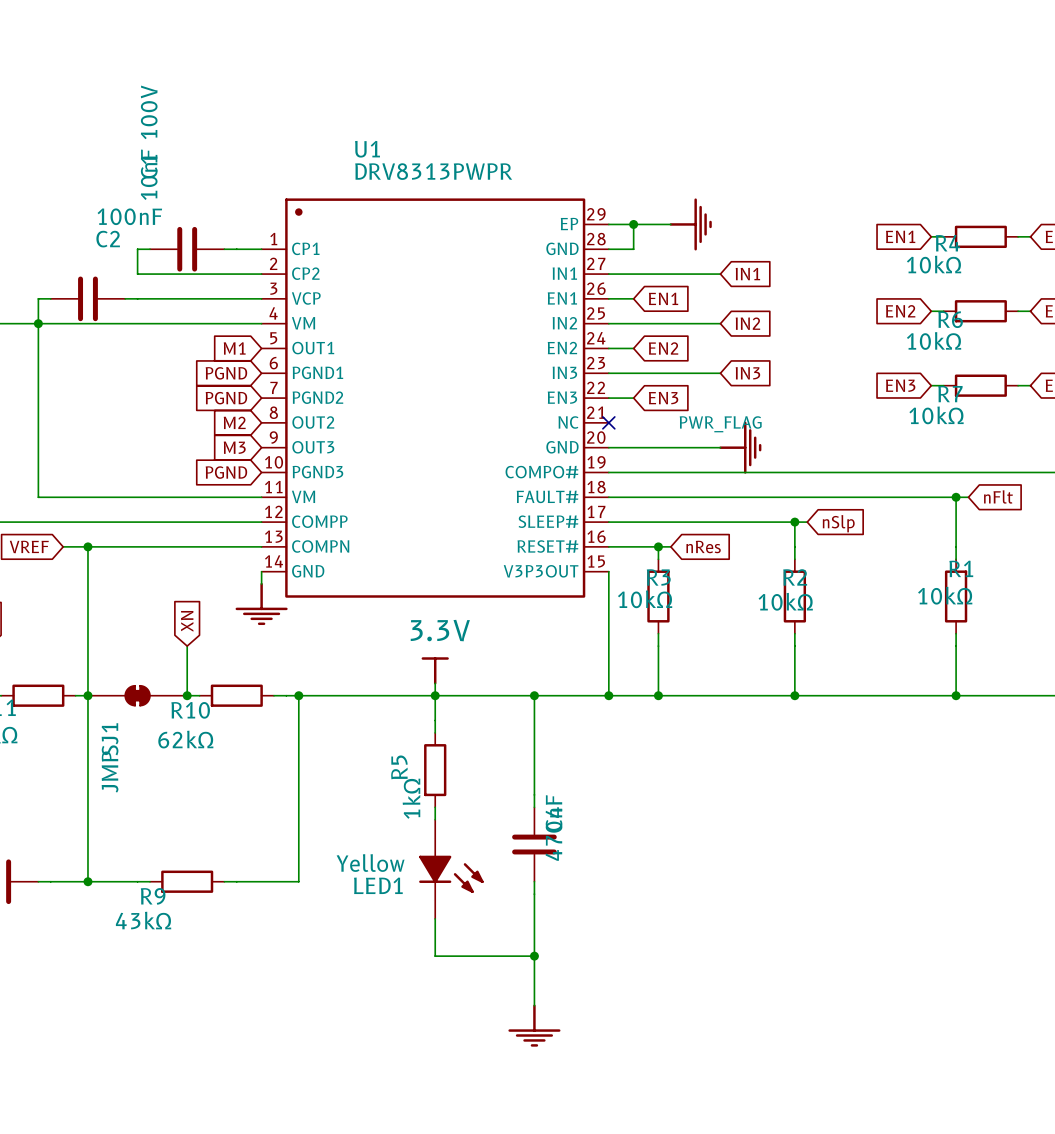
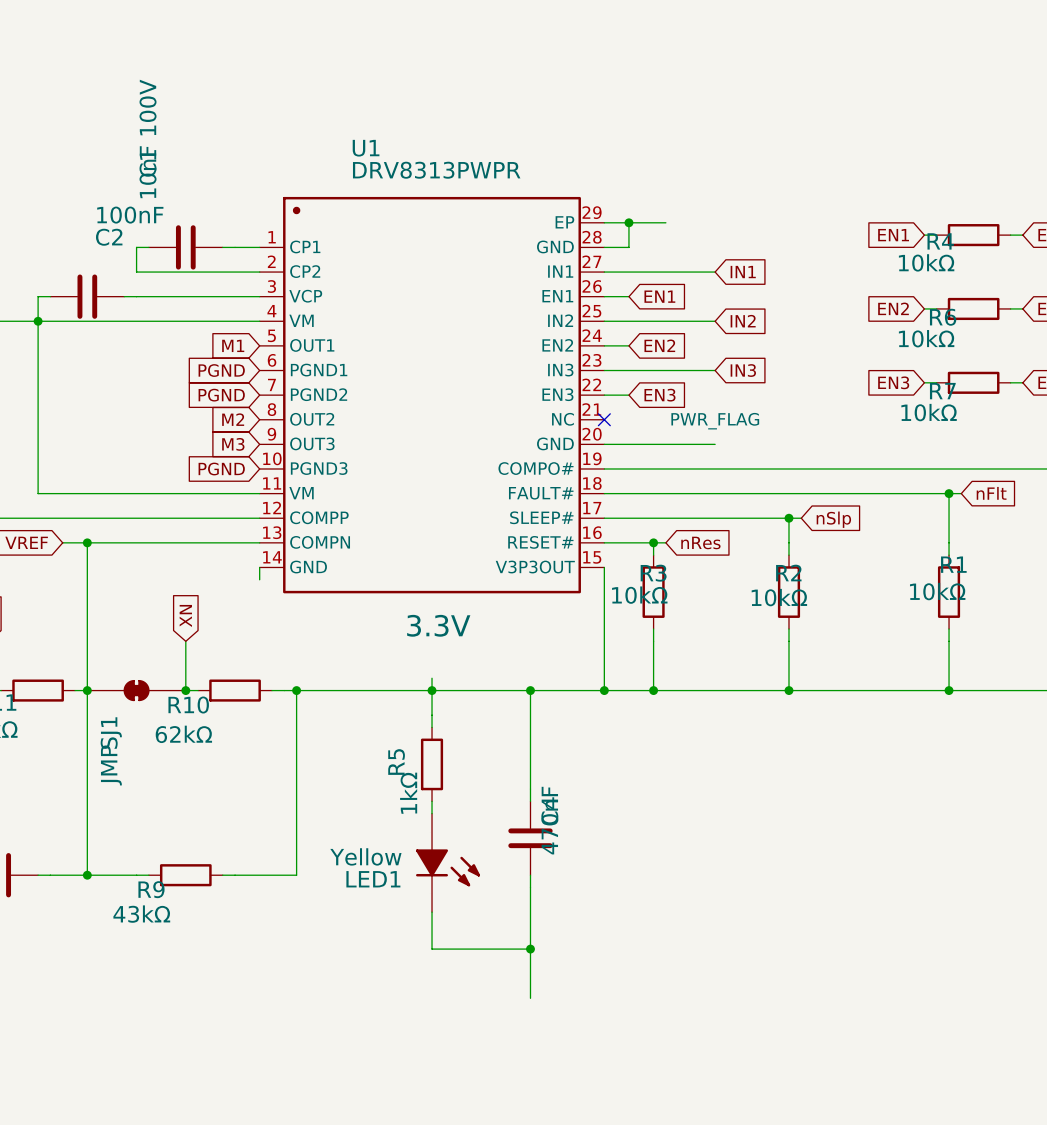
power symbol: (690, 224) -> none
power symbol: (740, 447) -> none
power symbol: (261, 603) -> none
power symbol: 3.3V (435, 670) -> none
power symbol: (534, 1025) -> none

